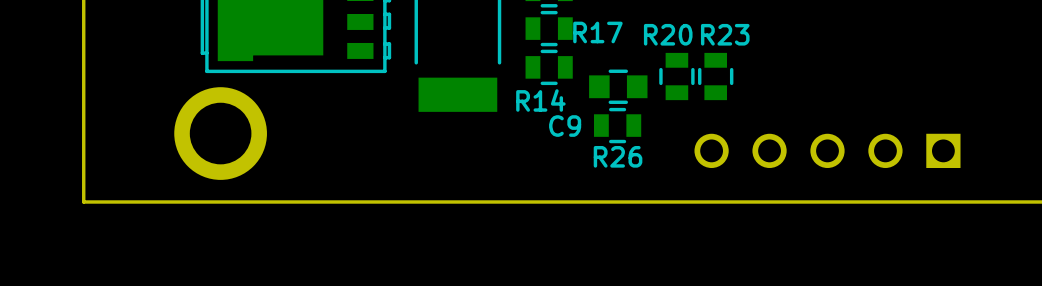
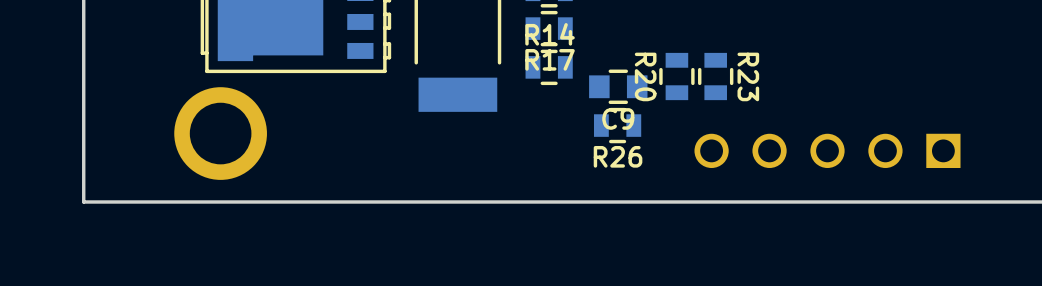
R17 name position: R17 (597, 32) -> R17 (550, 59)
R20 name rotation: 0° (668, 34) -> 90° clockwise (645, 76)
R23 name rotation: 0° (725, 34) -> 90° clockwise (748, 76)
R14 name position: R14 (540, 100) -> R14 (550, 34)
C9 name position: C9 (565, 126) -> C9 (618, 118)

